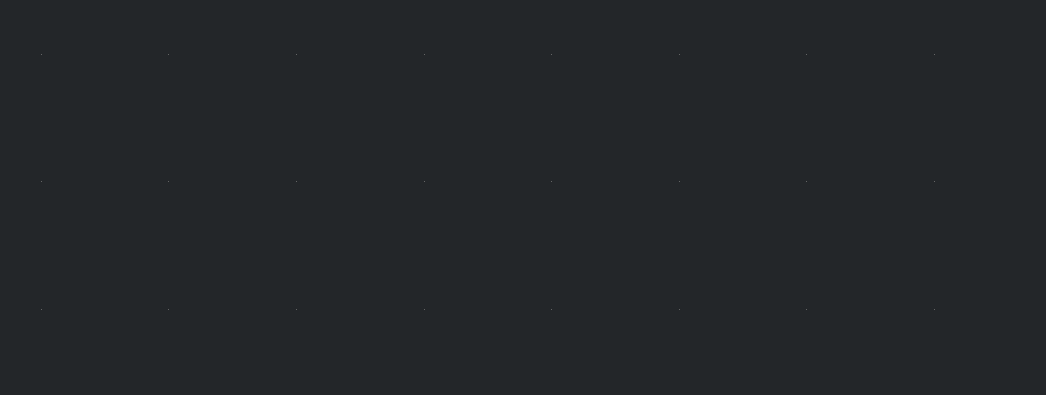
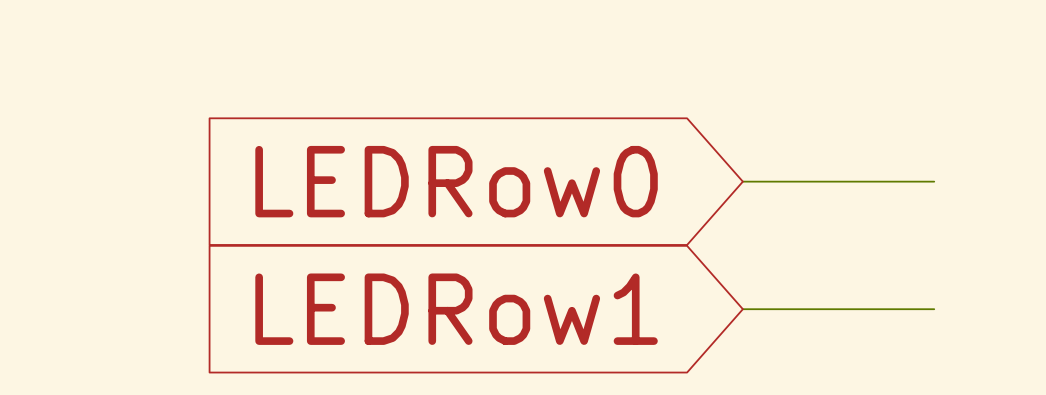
global label: none -> LEDRow0 (456, 181)
wire: none -> (742, 181) (934, 181)
global label: none -> LEDRow1 (456, 309)
wire: none -> (742, 309) (934, 309)

